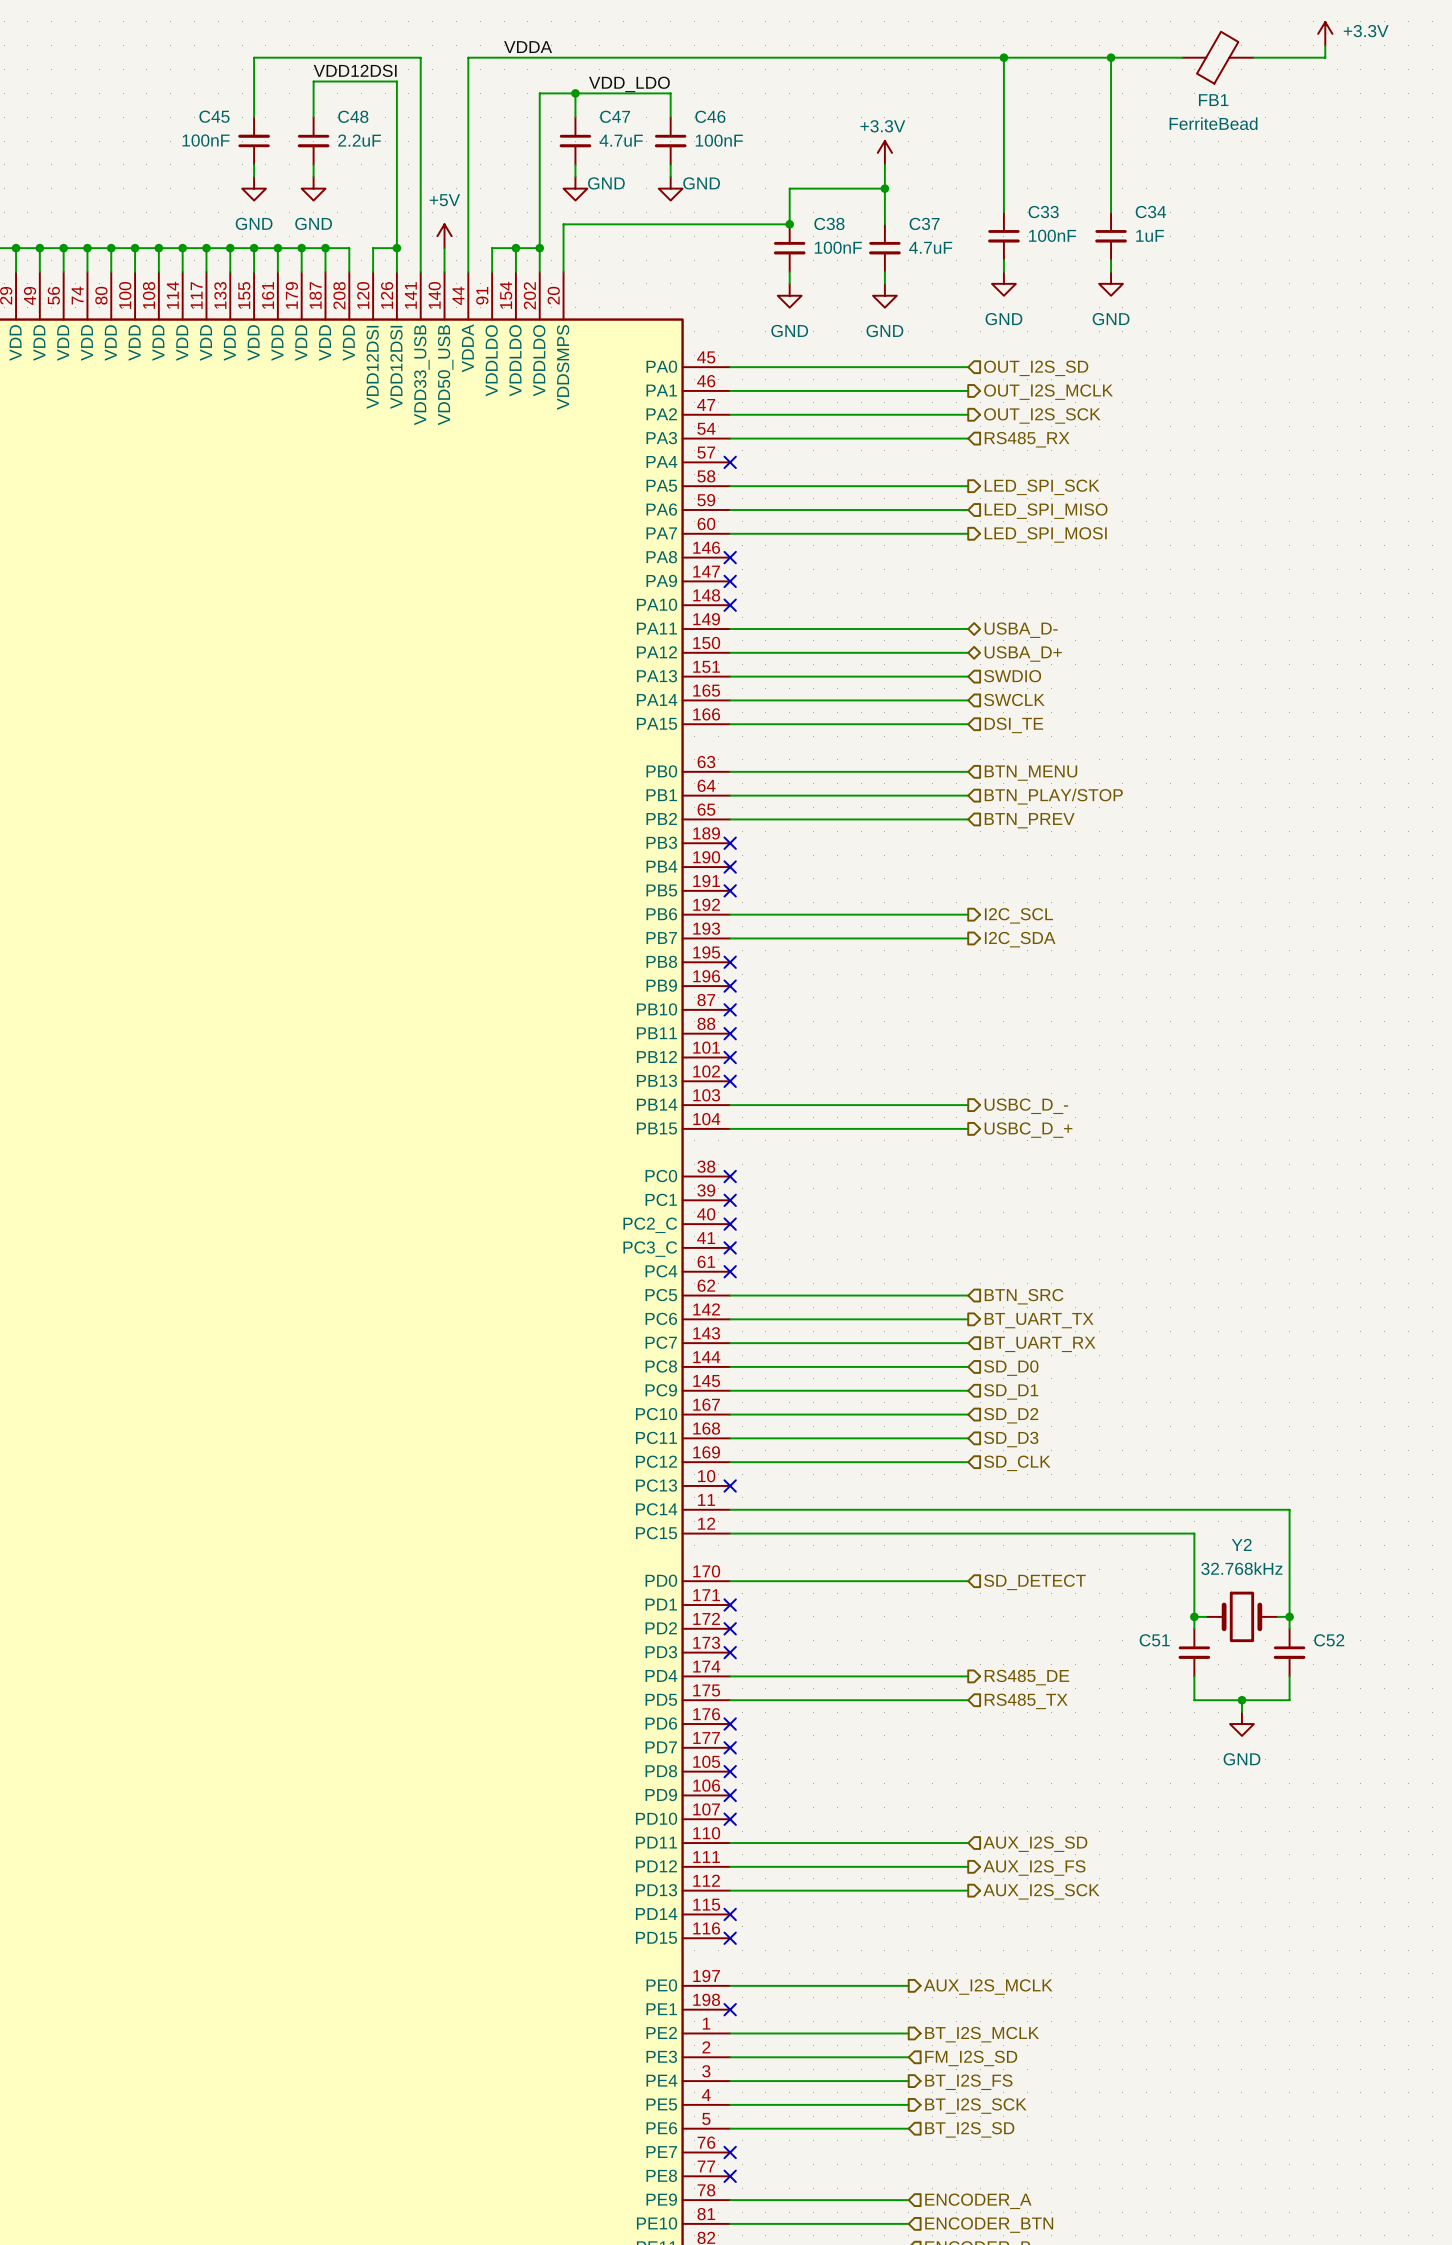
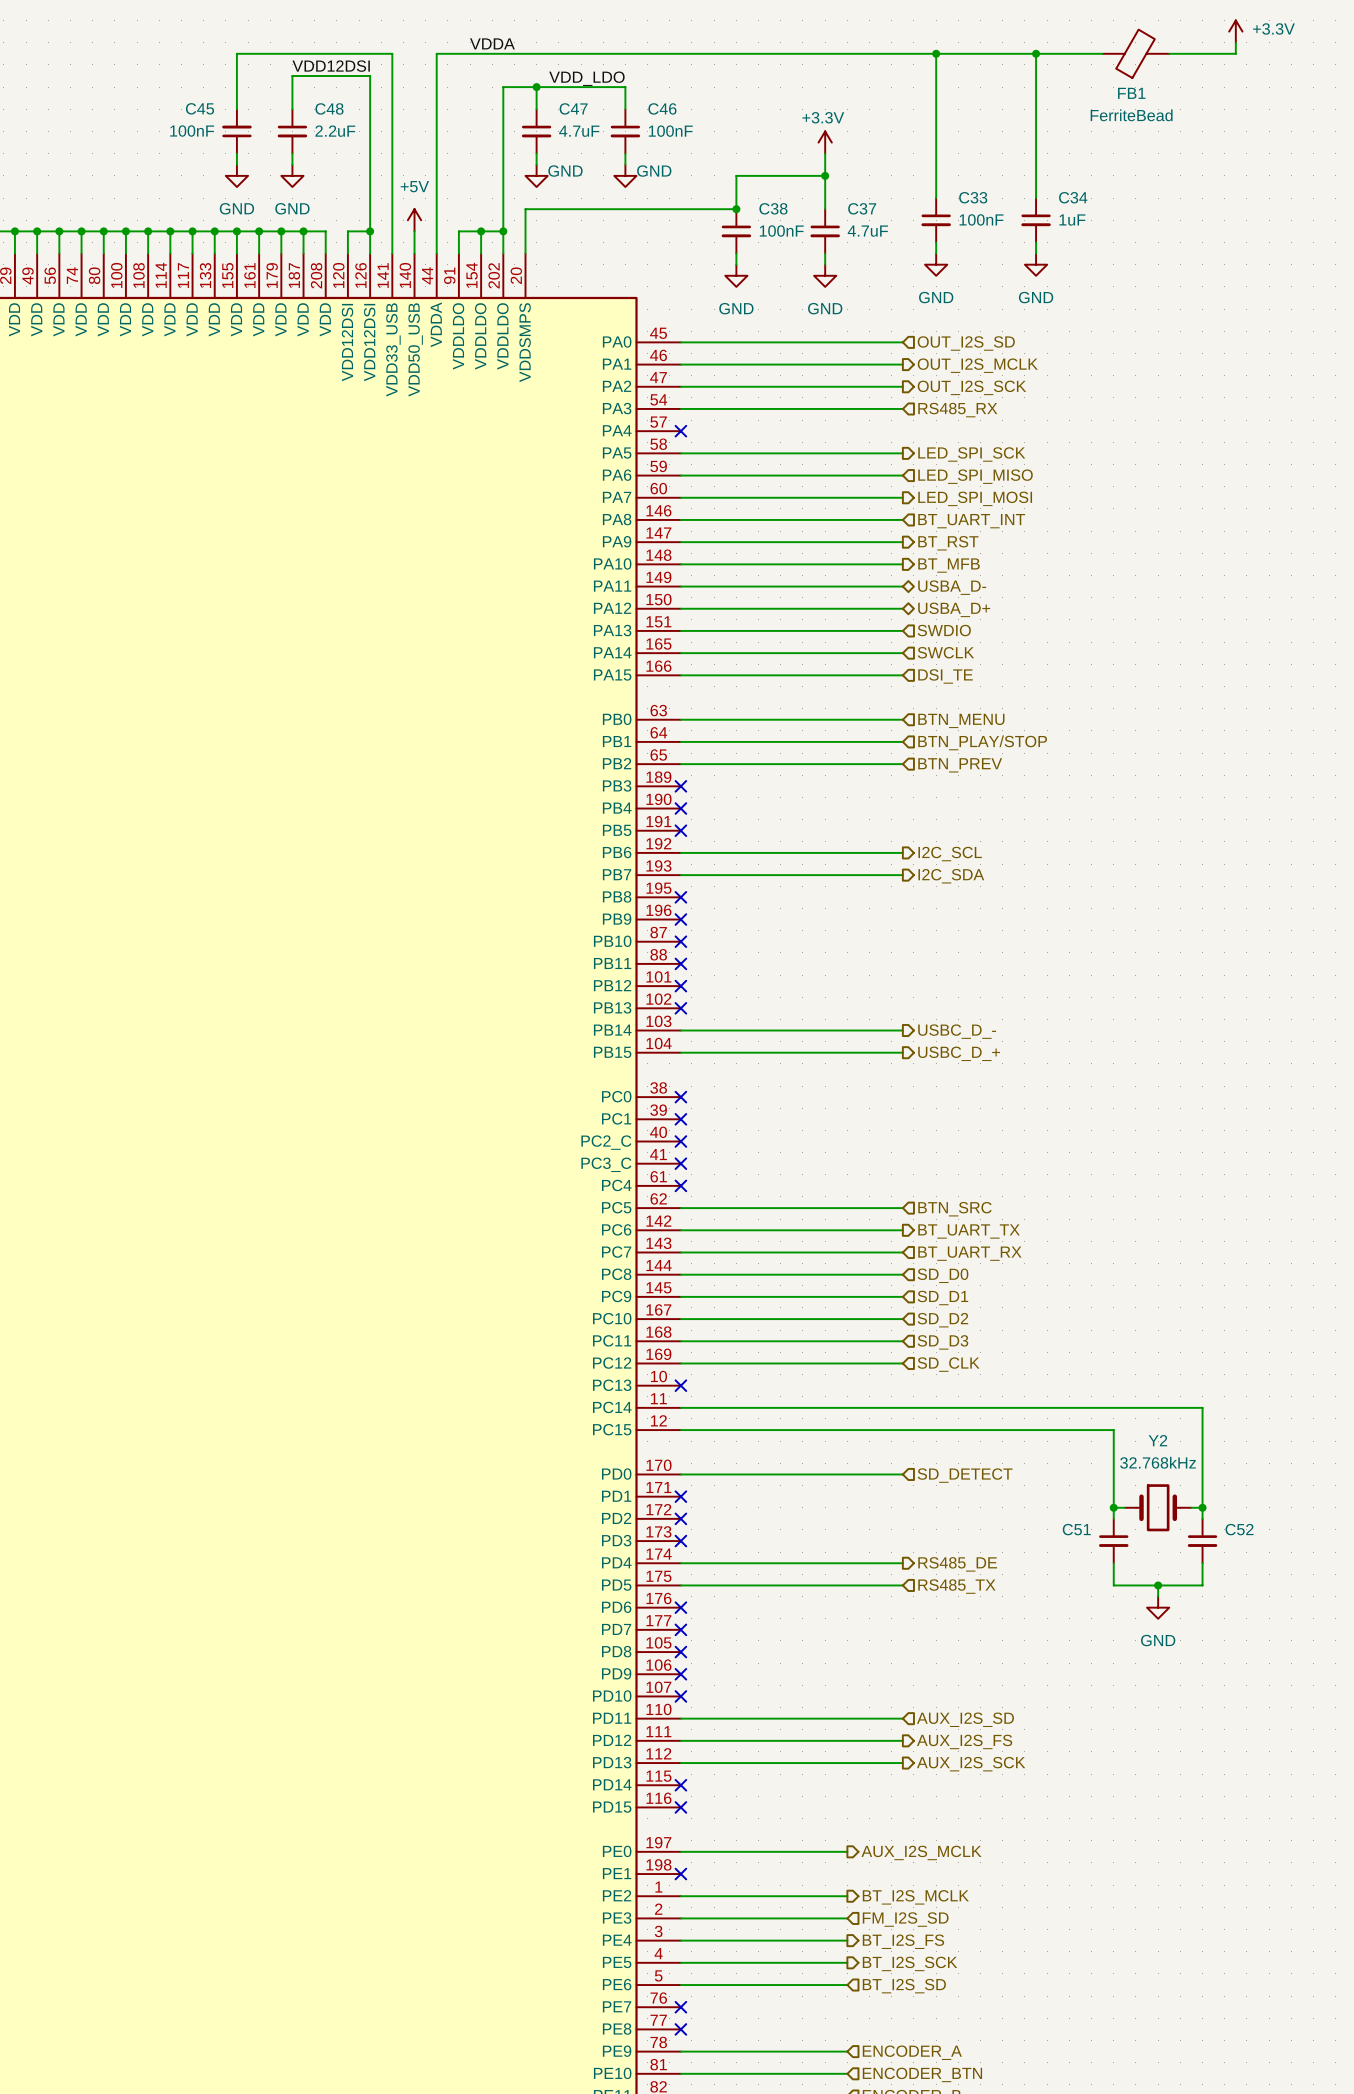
wire: none -> (680, 519) (902, 519)
no-connect mark: (730, 557) -> none
hierarchical label: none -> BT_UART_INT (971, 521)
wire: none -> (680, 542) (902, 542)
no-connect mark: (730, 581) -> none
hierarchical label: none -> BT_RST (948, 543)
wire: none -> (680, 564) (902, 564)
no-connect mark: (730, 605) -> none
hierarchical label: none -> BT_MFB (949, 565)

